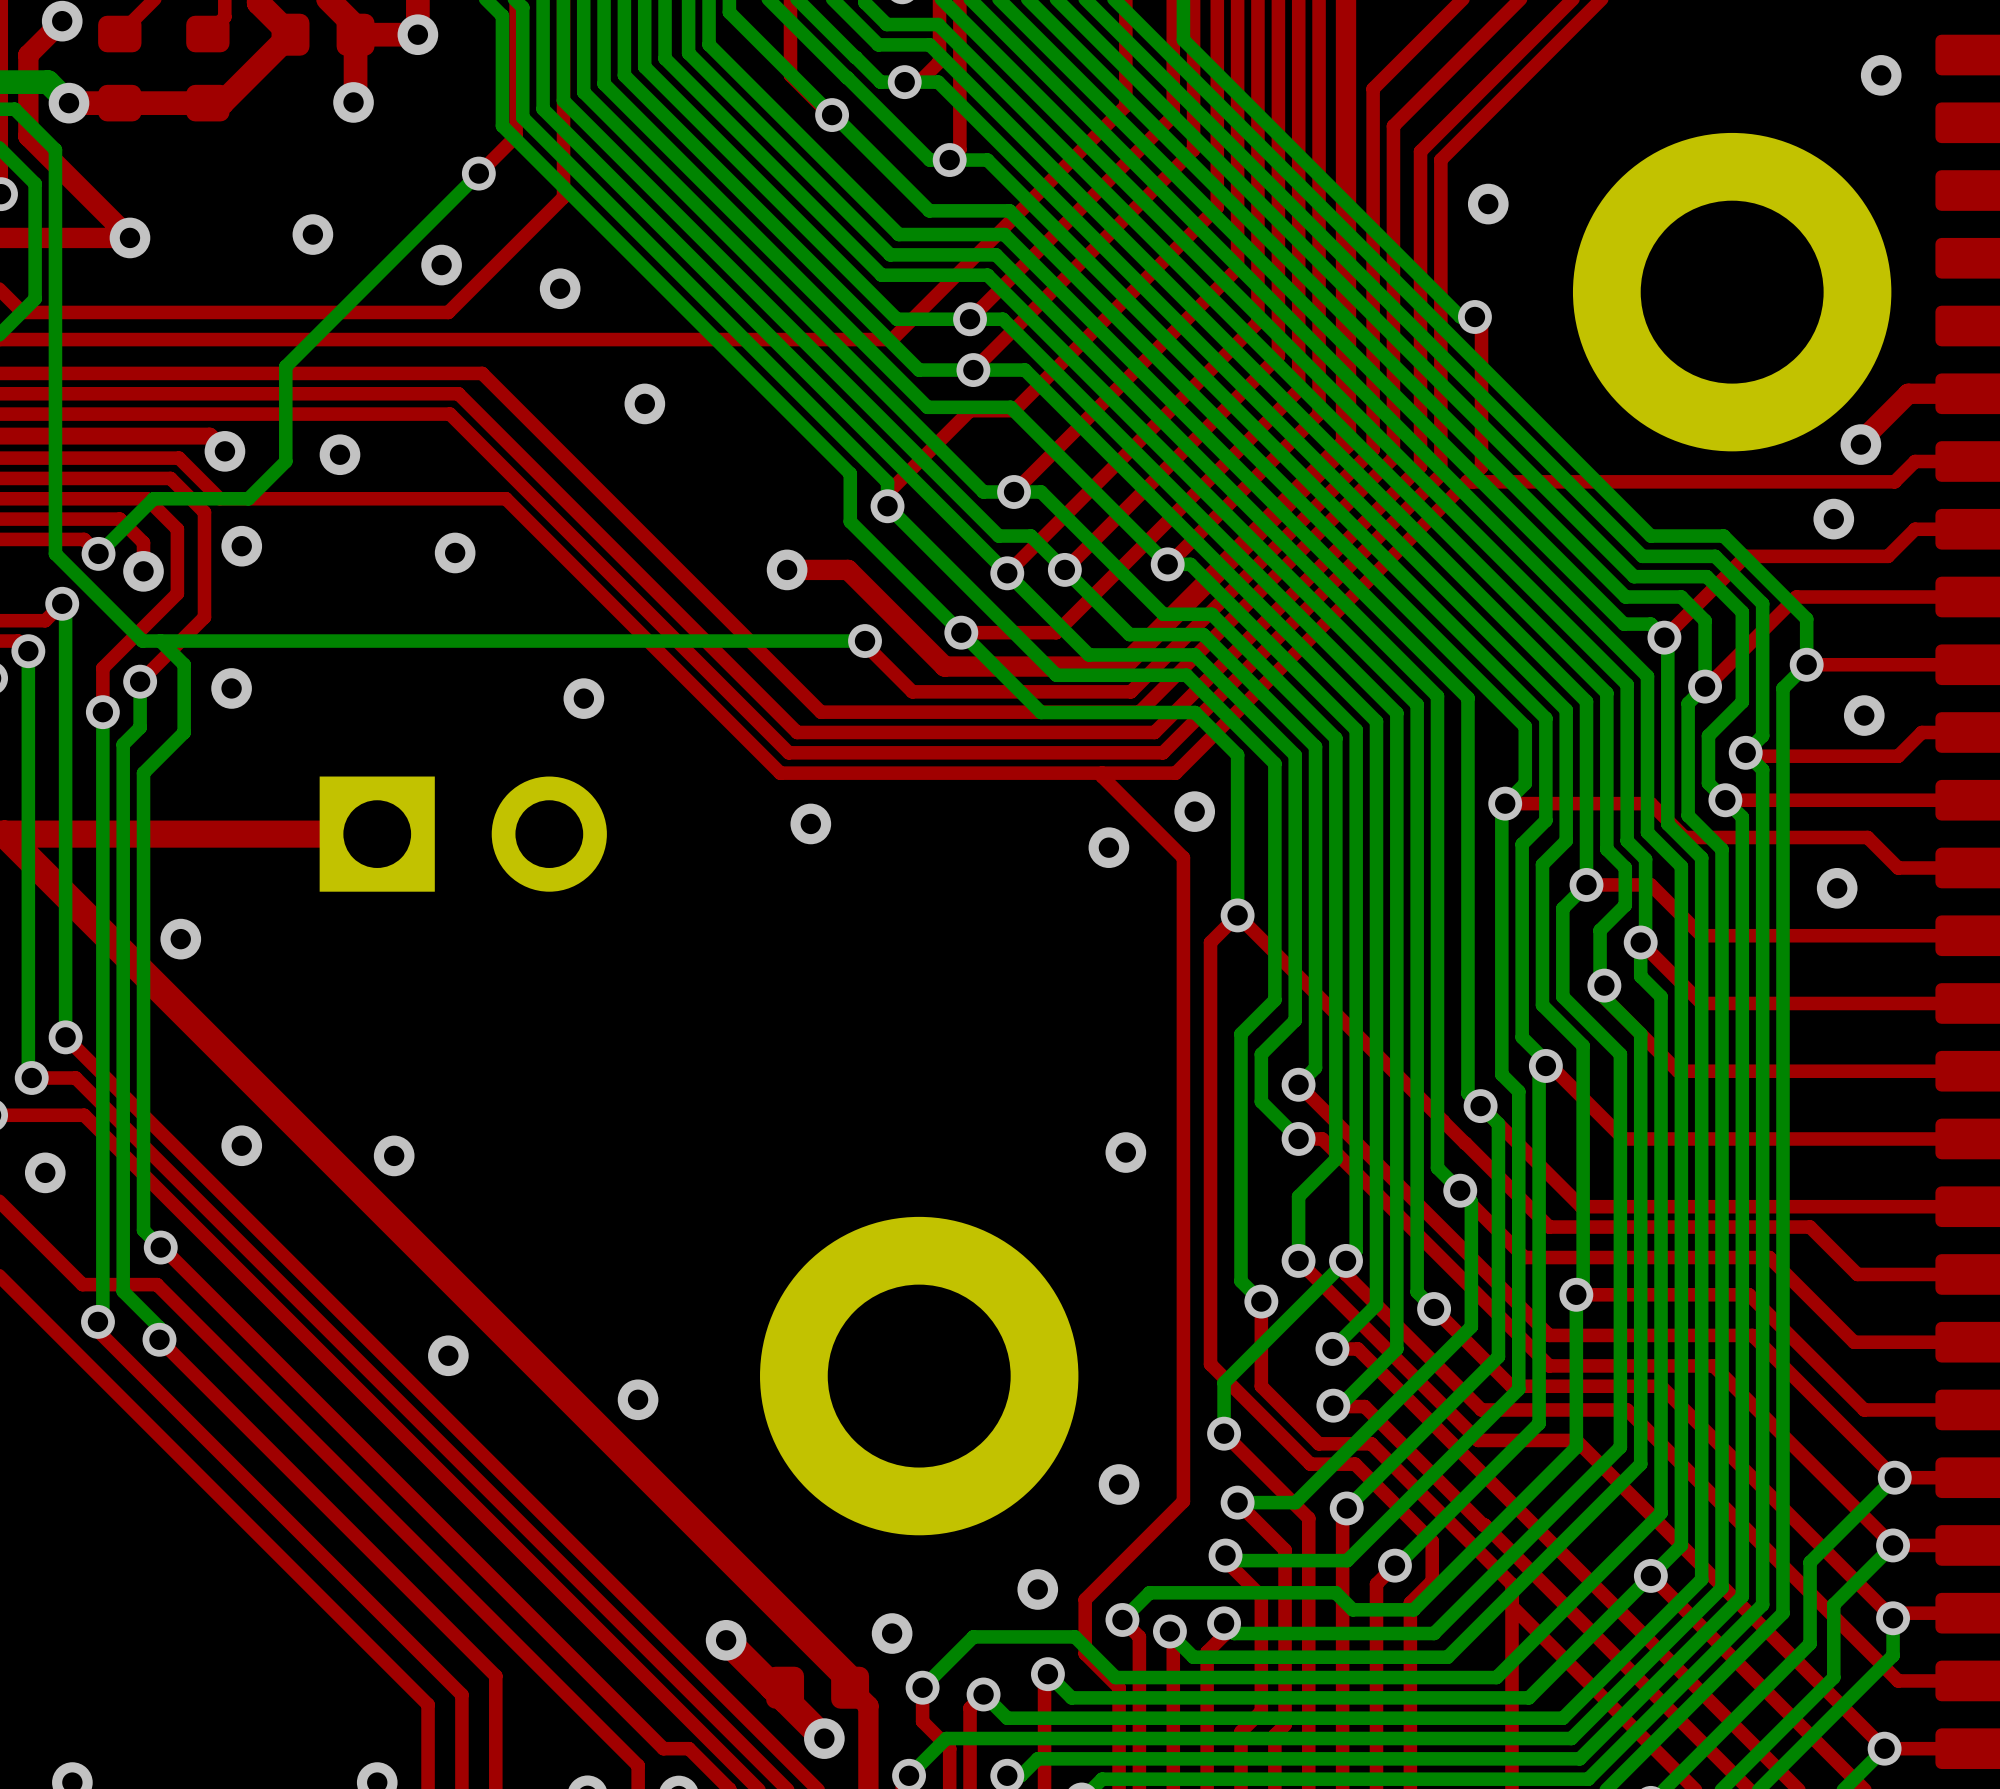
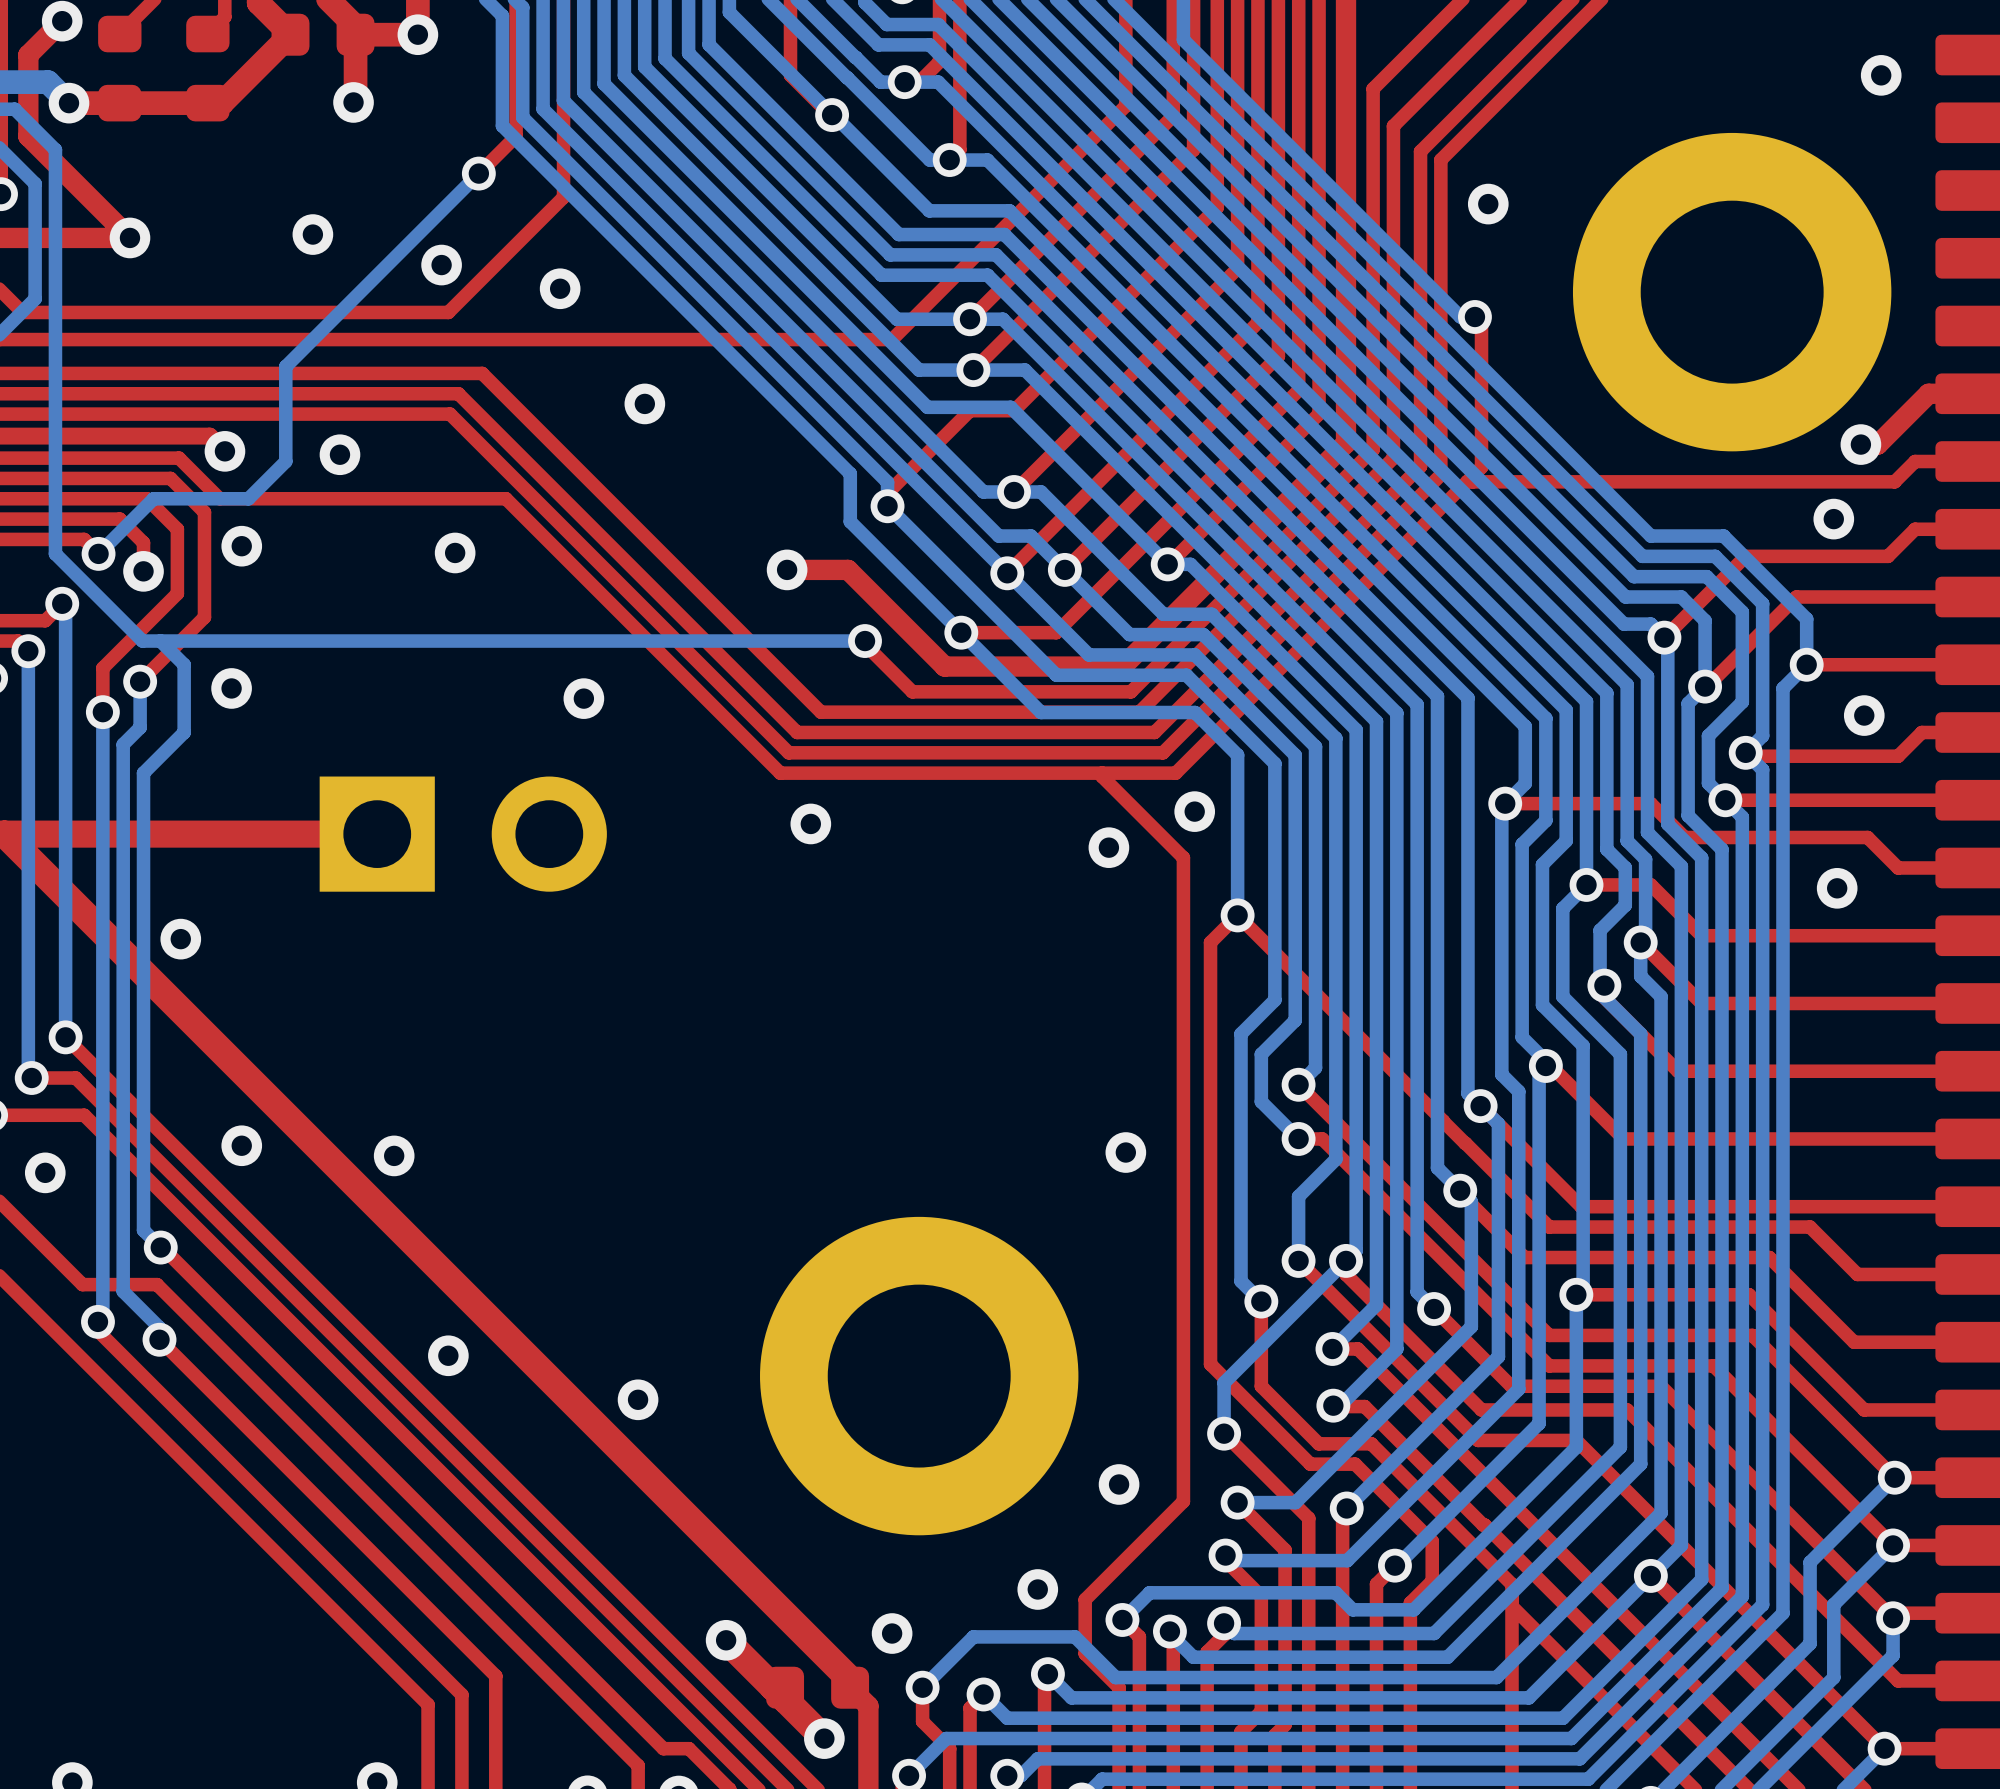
top track: (1928, 393) (1908, 393) (1860, 441) (1860, 444) -> (1928, 393) (1877, 444) (1860, 444)

